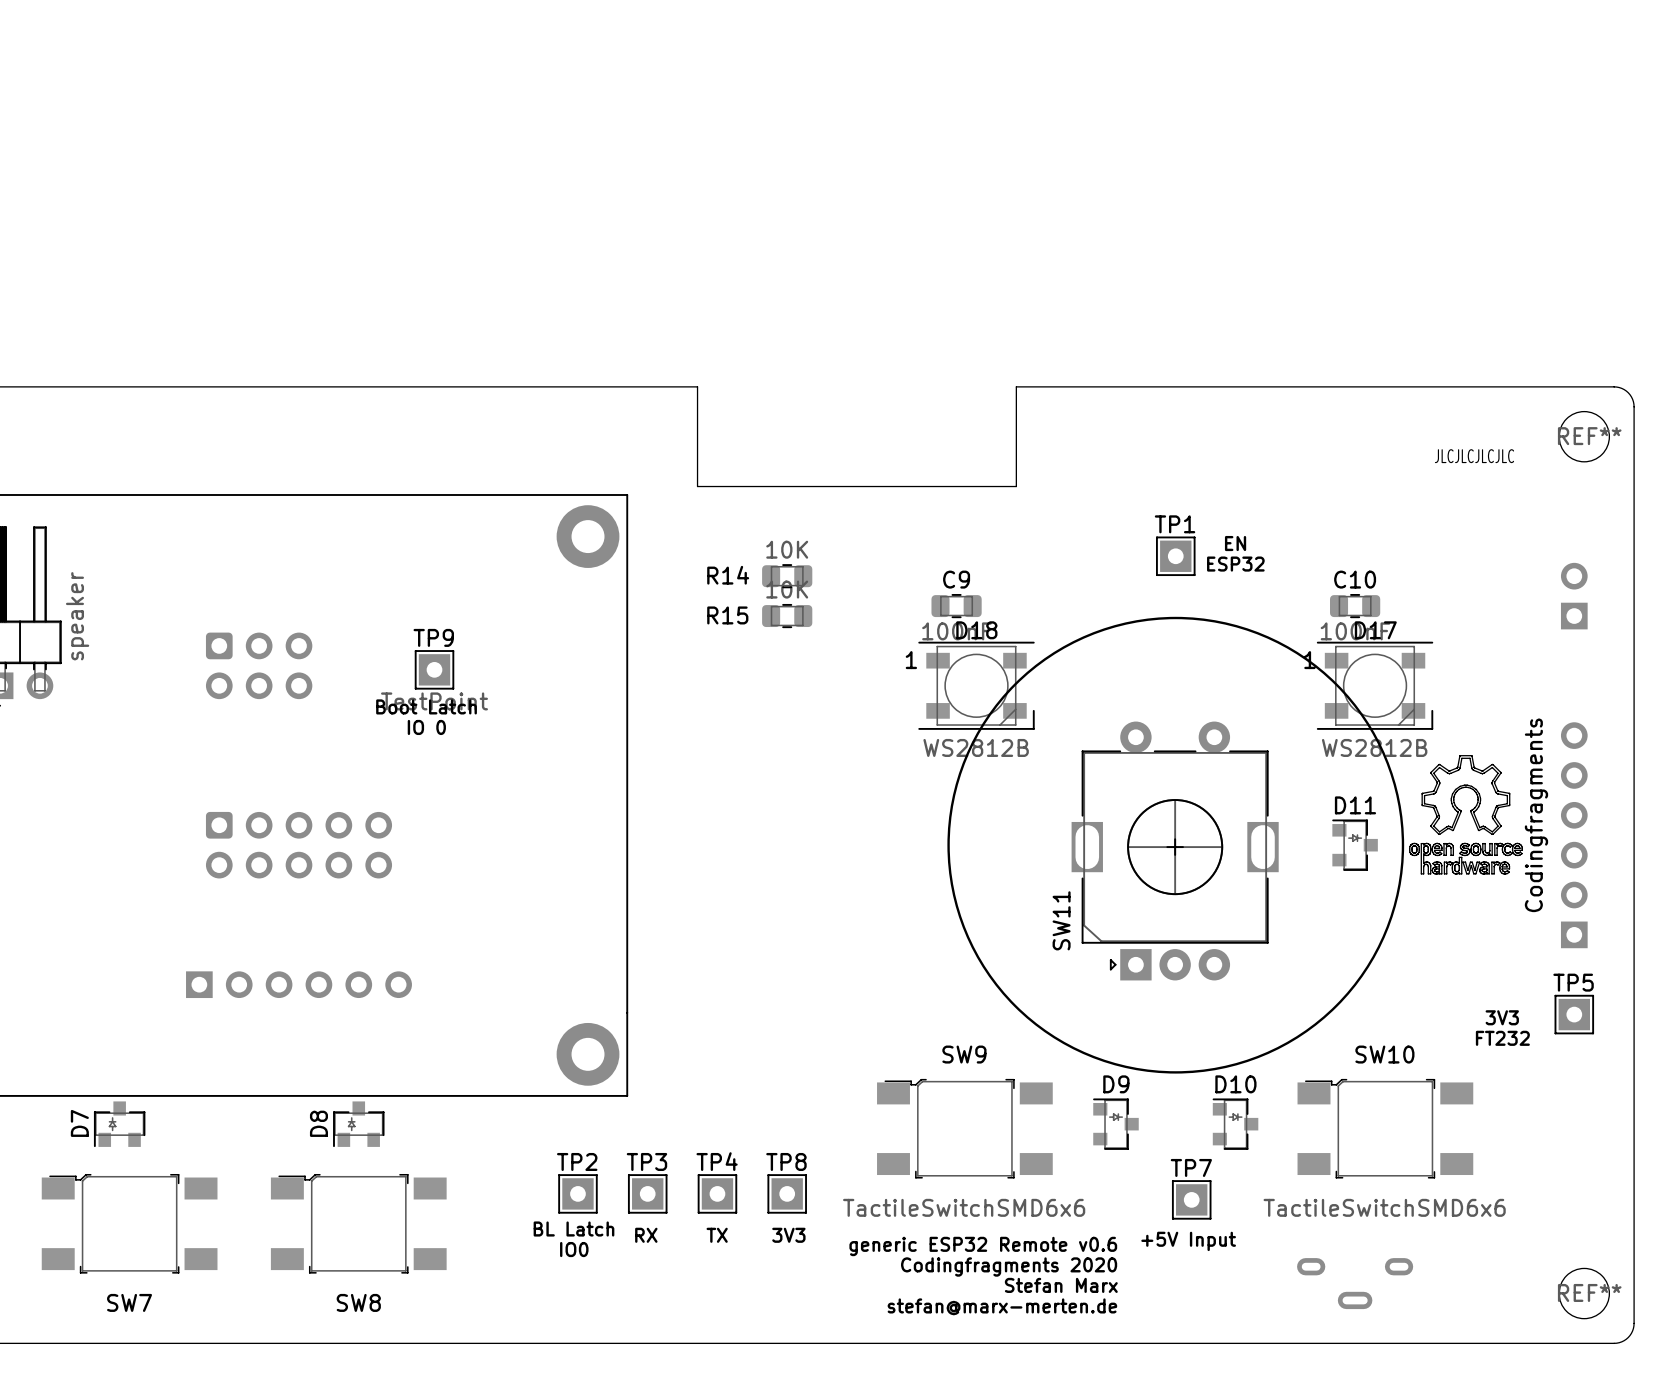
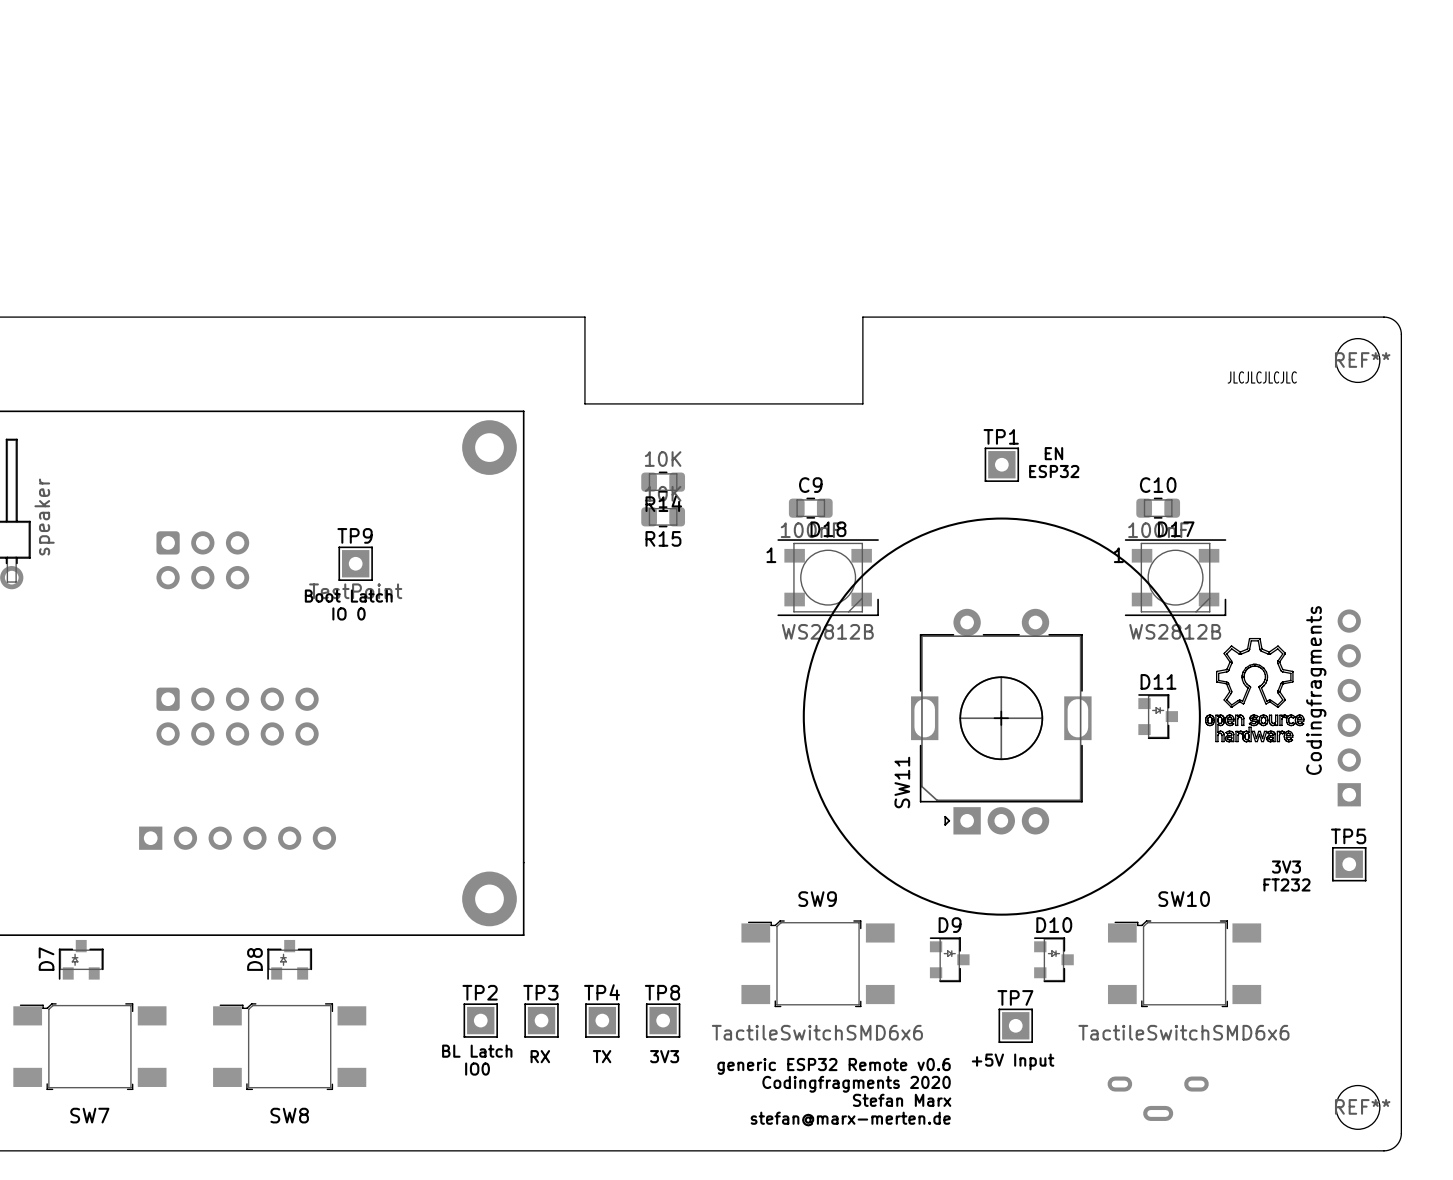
R14 name position: R14 (728, 575) -> R14 (663, 503)
part: (1574, 596) -> none
R15 name position: R15 (727, 615) -> R15 (663, 538)

